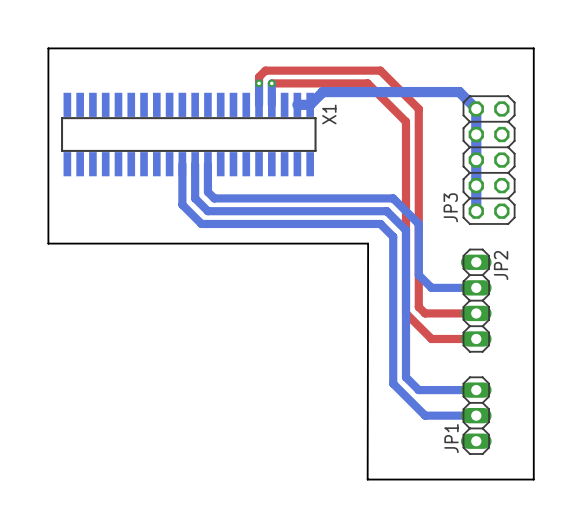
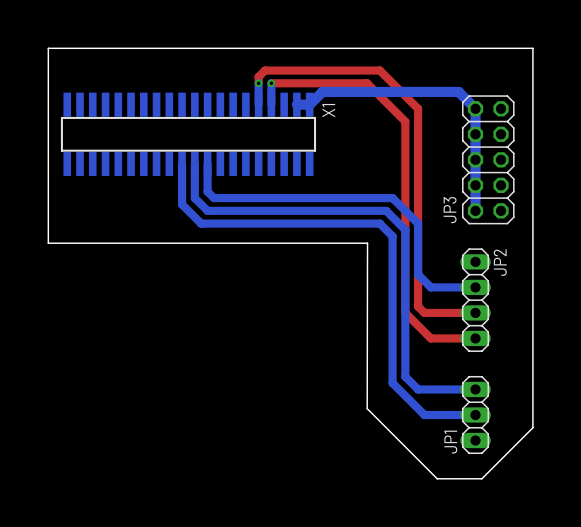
board edge: (367, 409) (367, 479) (437, 479) -> (367, 408) (437, 478)
board edge: (533, 428) (533, 479) (482, 479) -> (532, 427) (481, 478)

